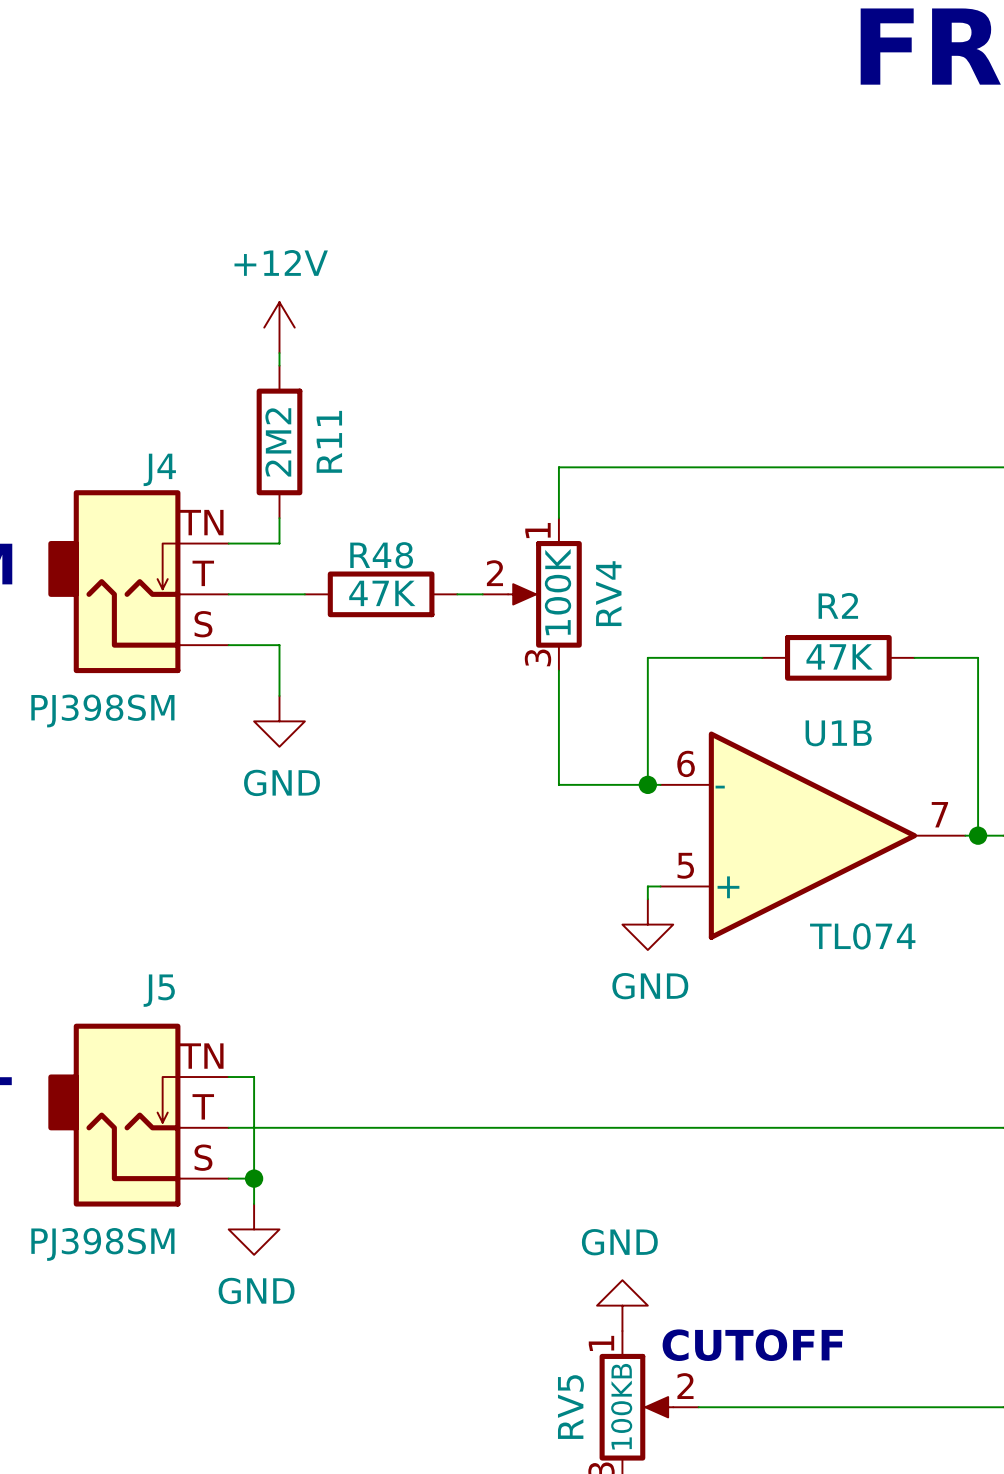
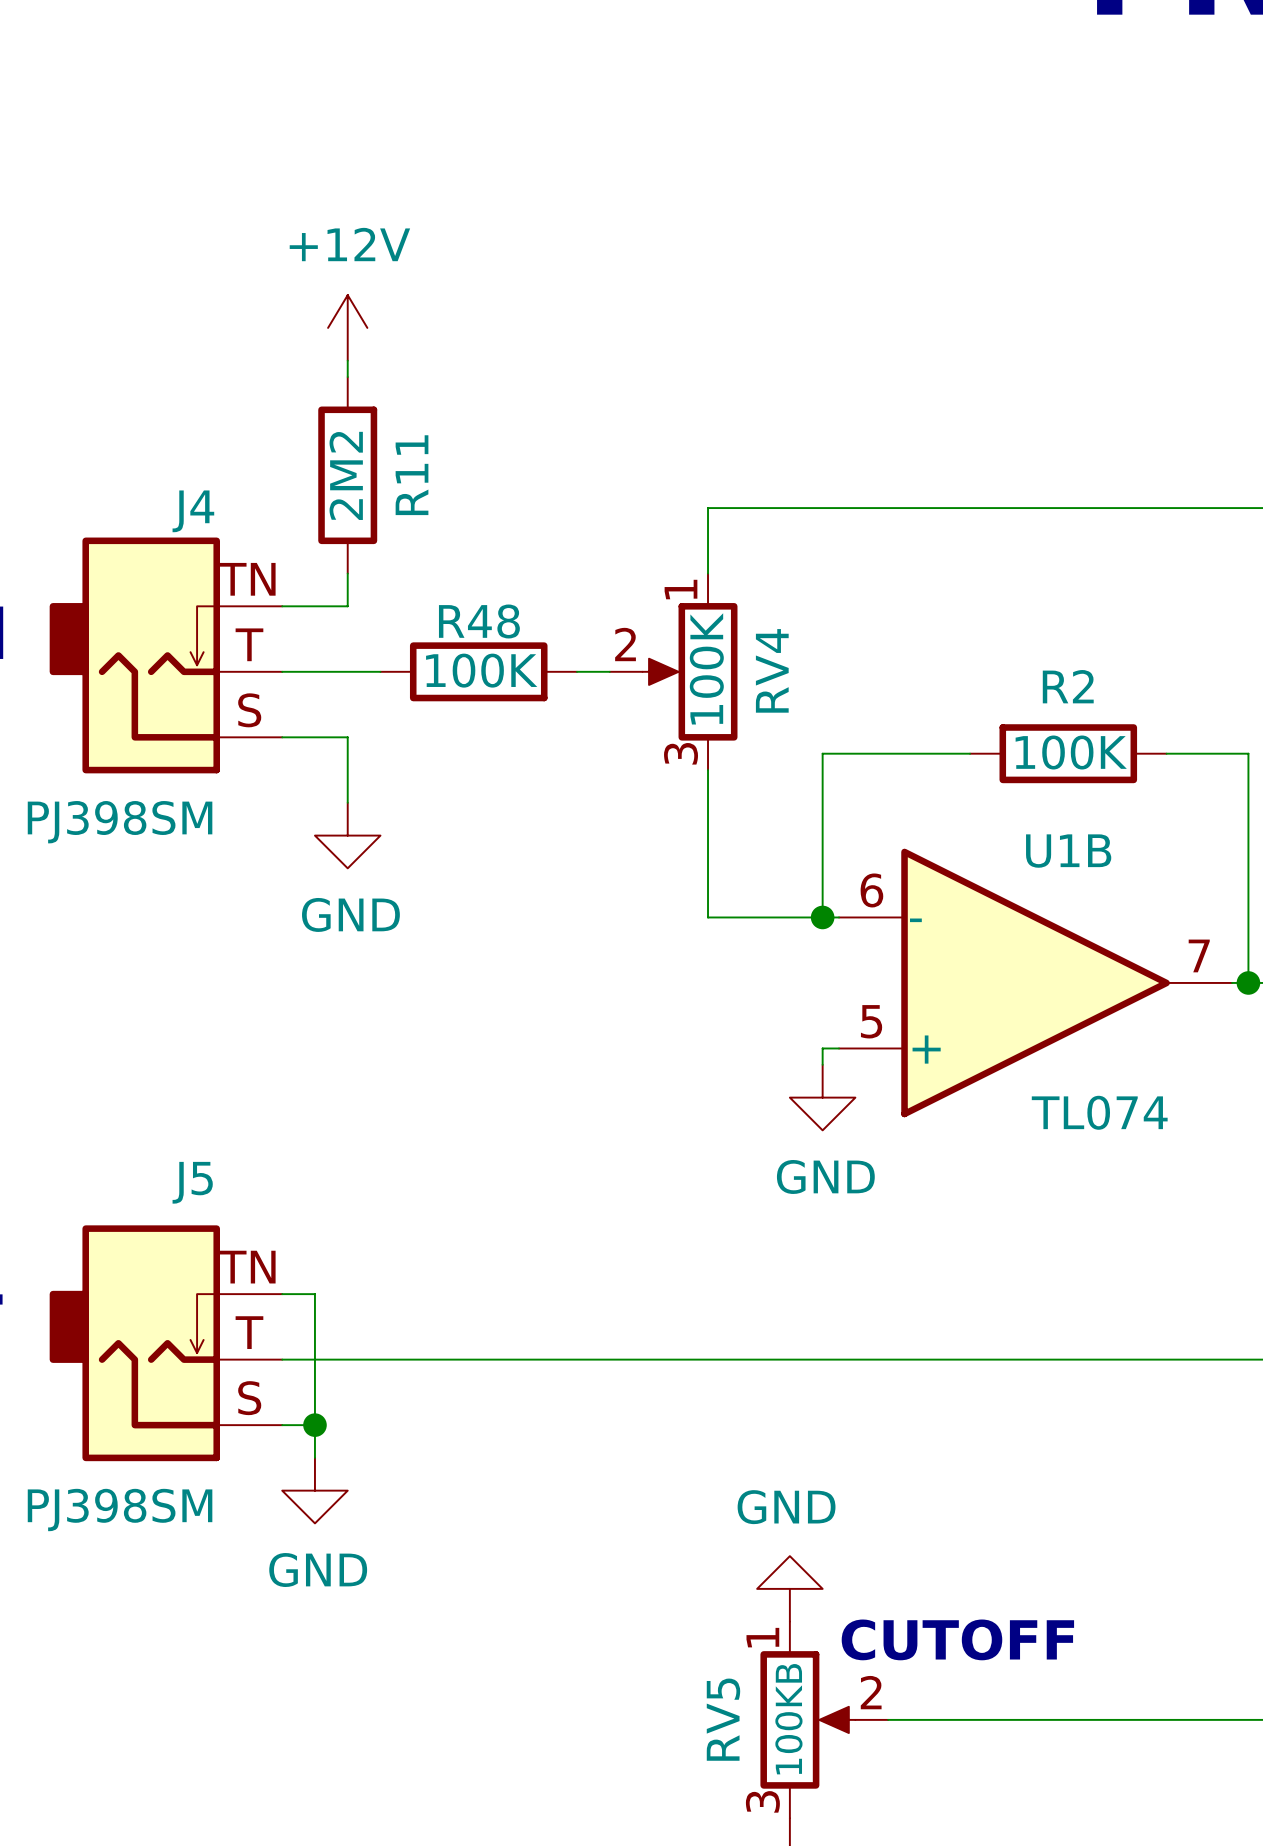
R48 value: 47K (382, 593) -> 100K (481, 670)
R2 value: 47K (839, 656) -> 100K (1071, 752)

